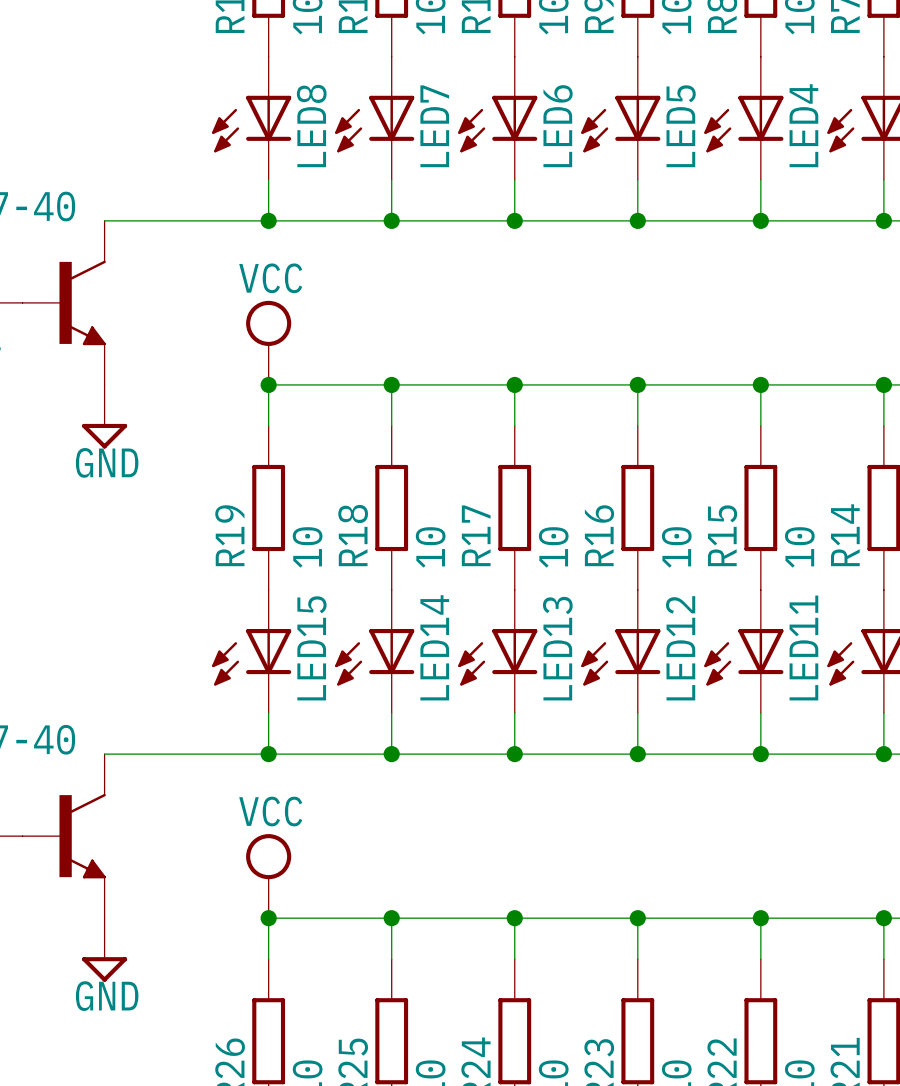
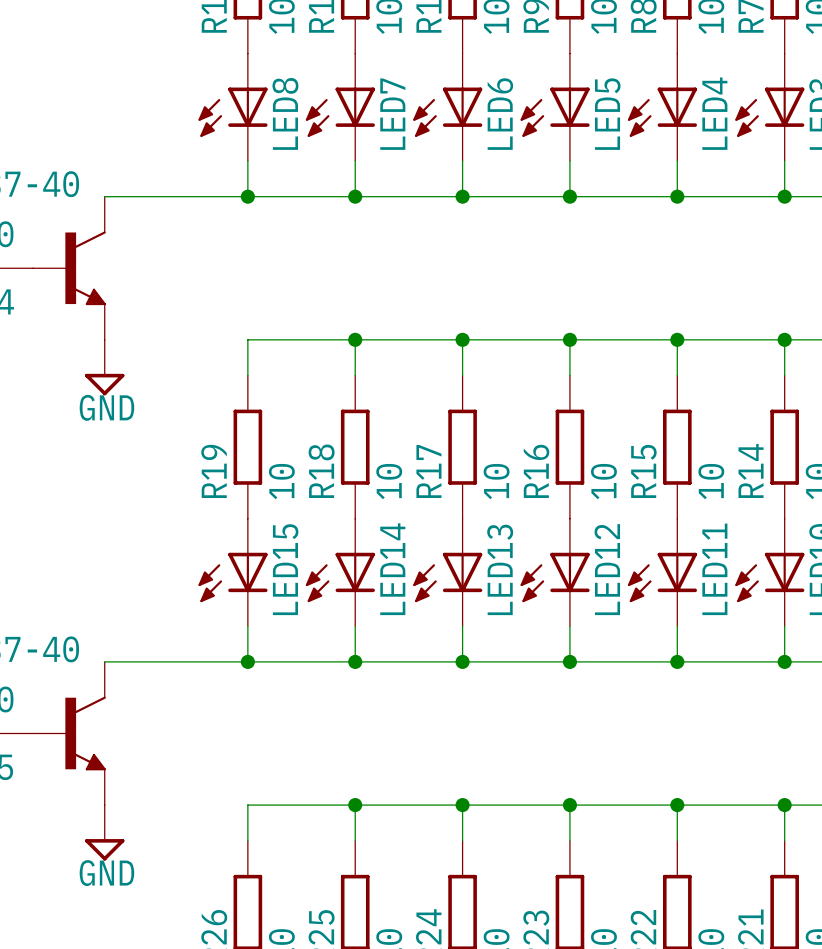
power symbol: VCC (268, 342) -> none
junction: (268, 384) -> none
power symbol: VCC (268, 876) -> none
junction: (268, 918) -> none

